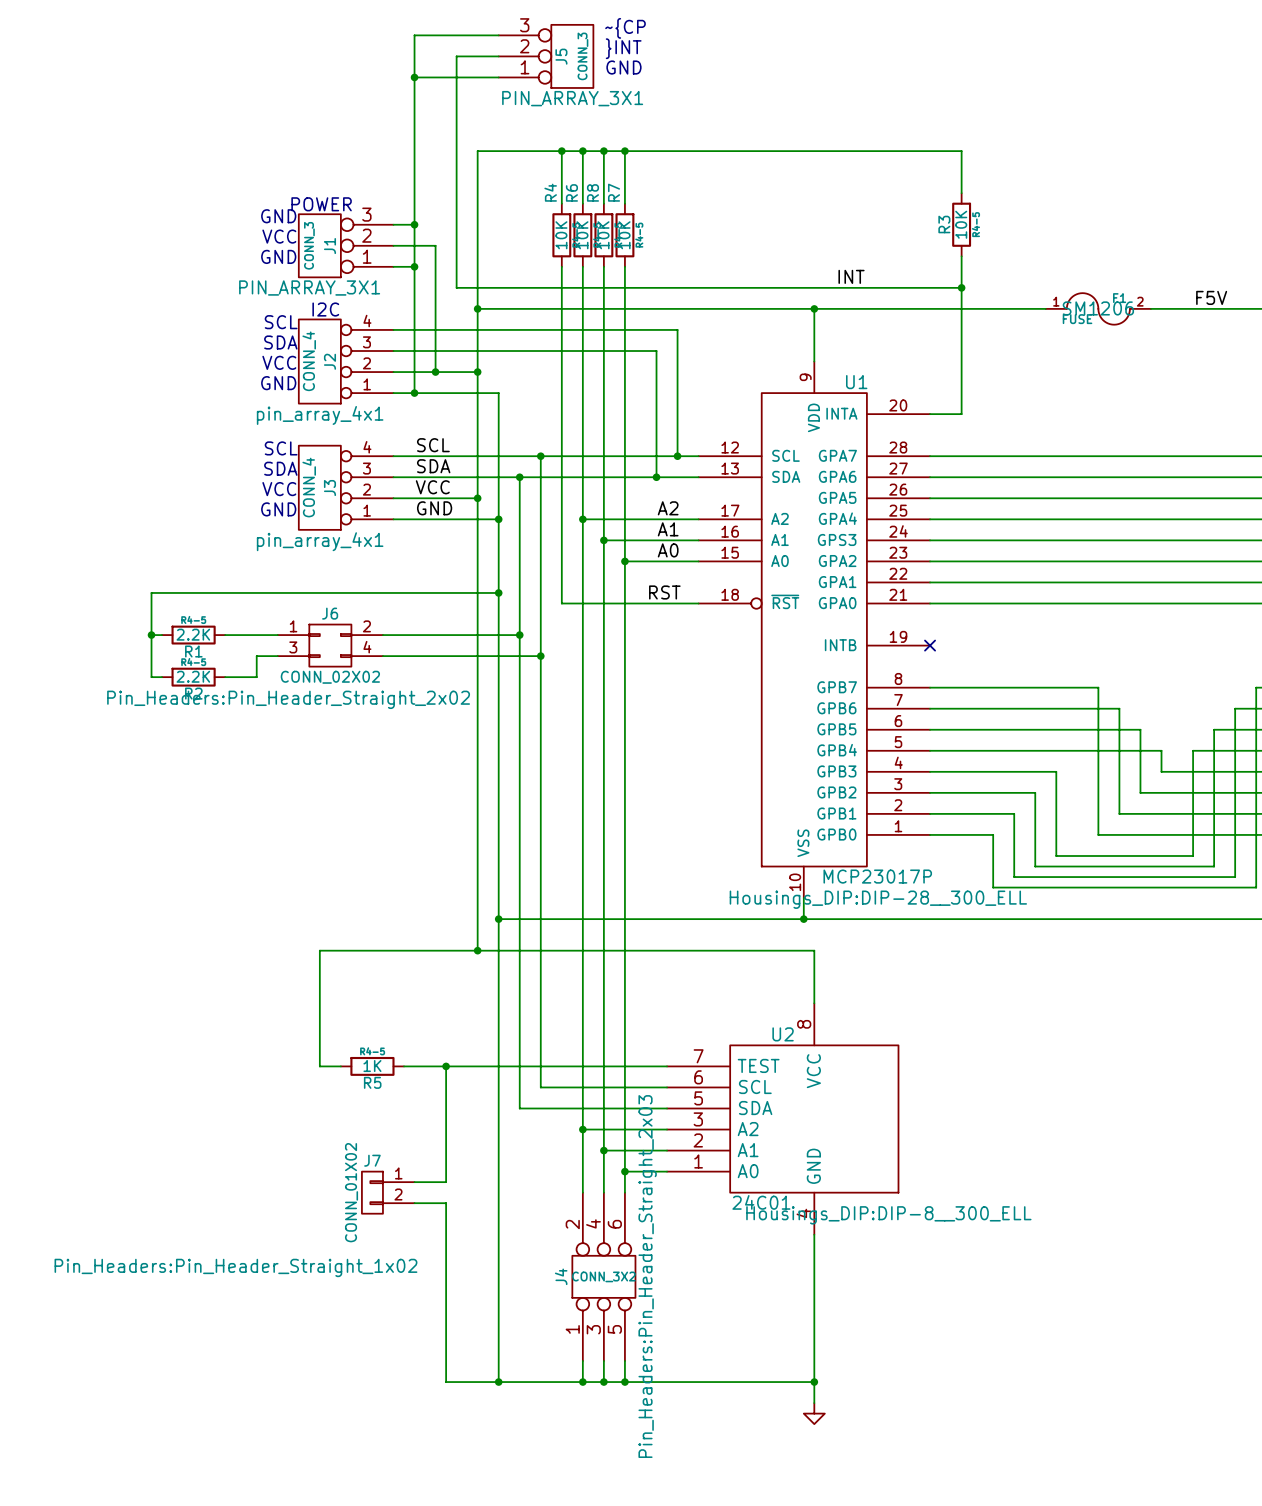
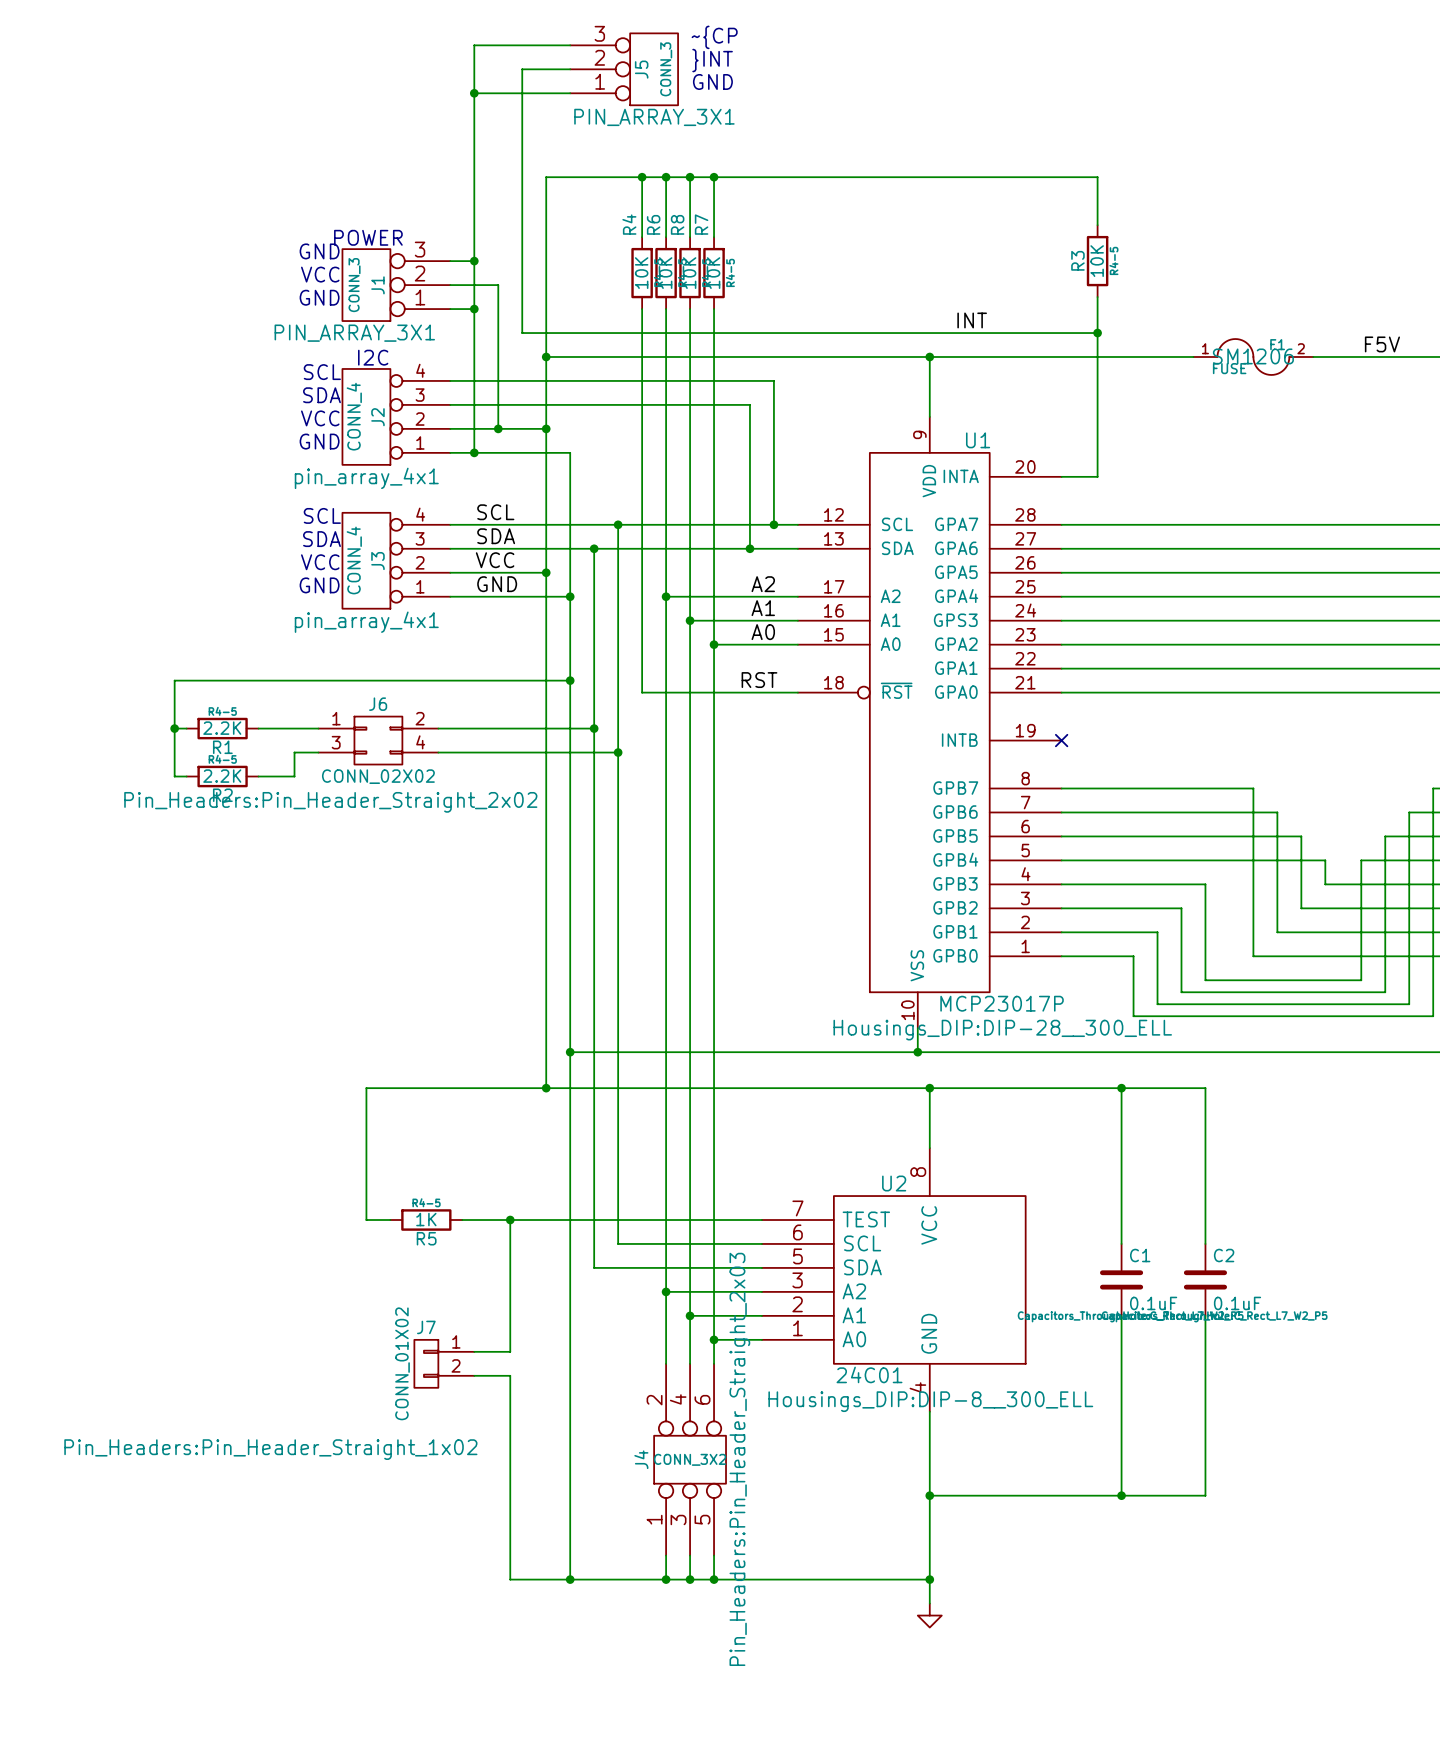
wire: none -> (929, 1088) (1205, 1088) (1205, 1243)
junction: none -> (929, 1088)
wire: none -> (1121, 1088) (1121, 1243)
junction: none -> (1121, 1088)
C1: none -> 0.1uF (1121, 1279)
C2: none -> 0.1uF (1205, 1279)
wire: none -> (1121, 1315) (1121, 1495)
wire: none -> (1205, 1315) (1205, 1495) (929, 1495)
U2 text position: Housings_DIP:DIP-8__300_ELL (888, 1215) -> Housings_DIP:DIP-8__300_ELL (930, 1401)
junction: none -> (929, 1495)
junction: none -> (1121, 1495)

